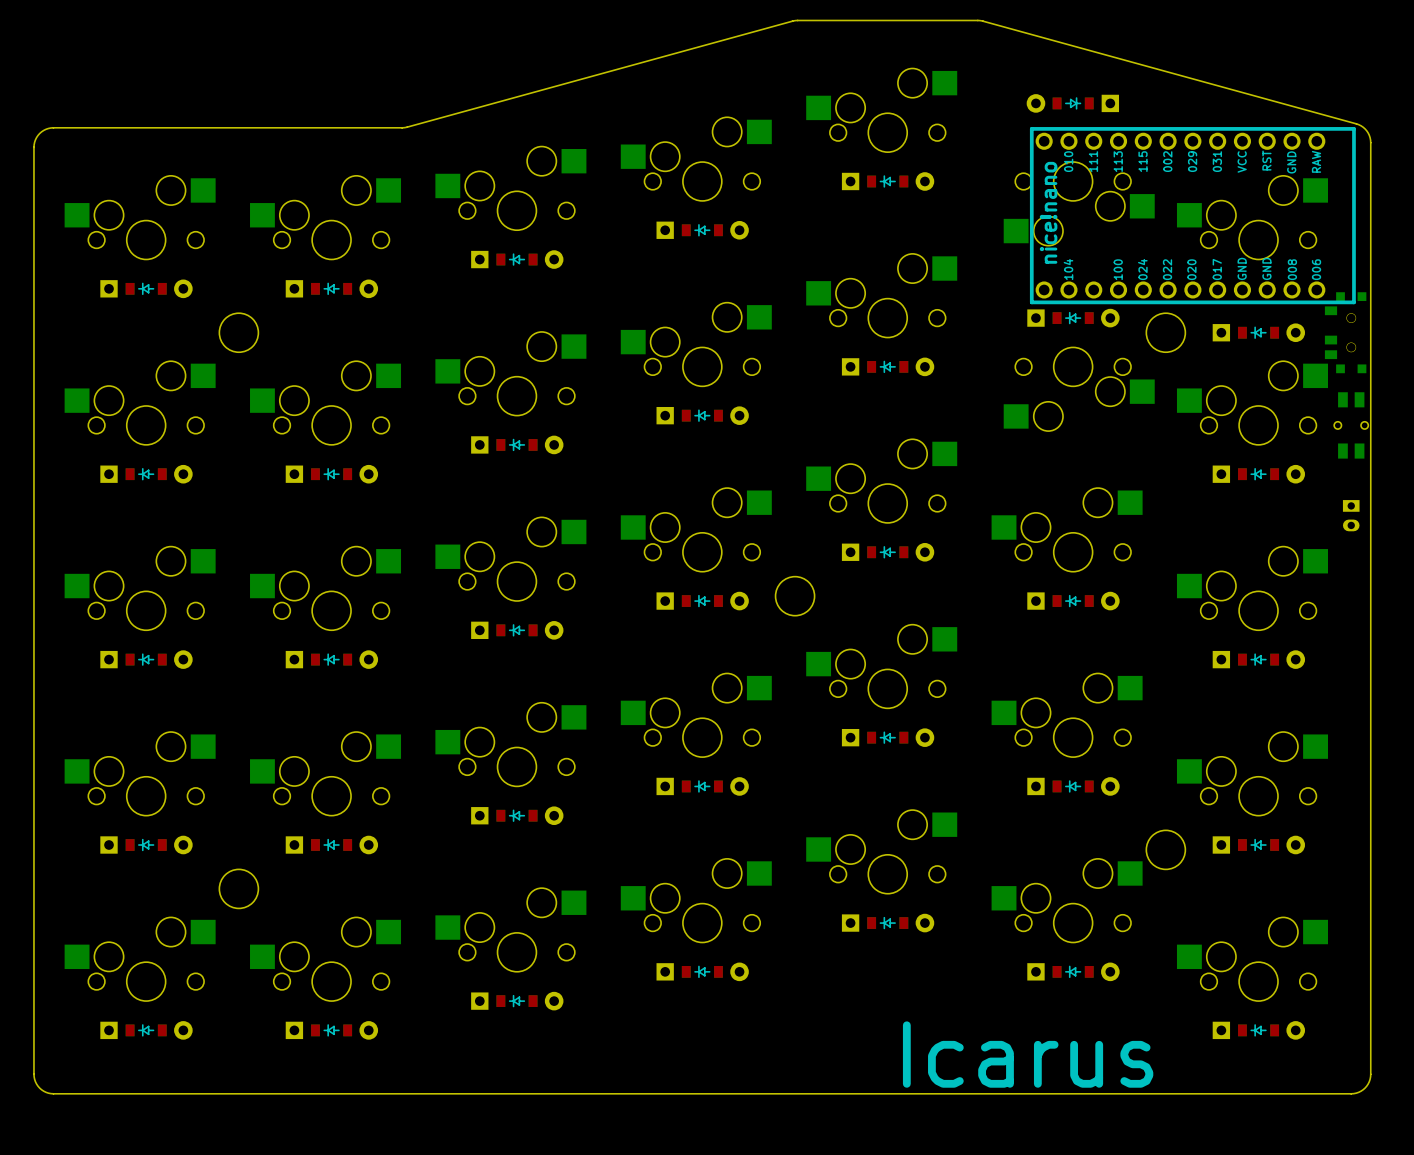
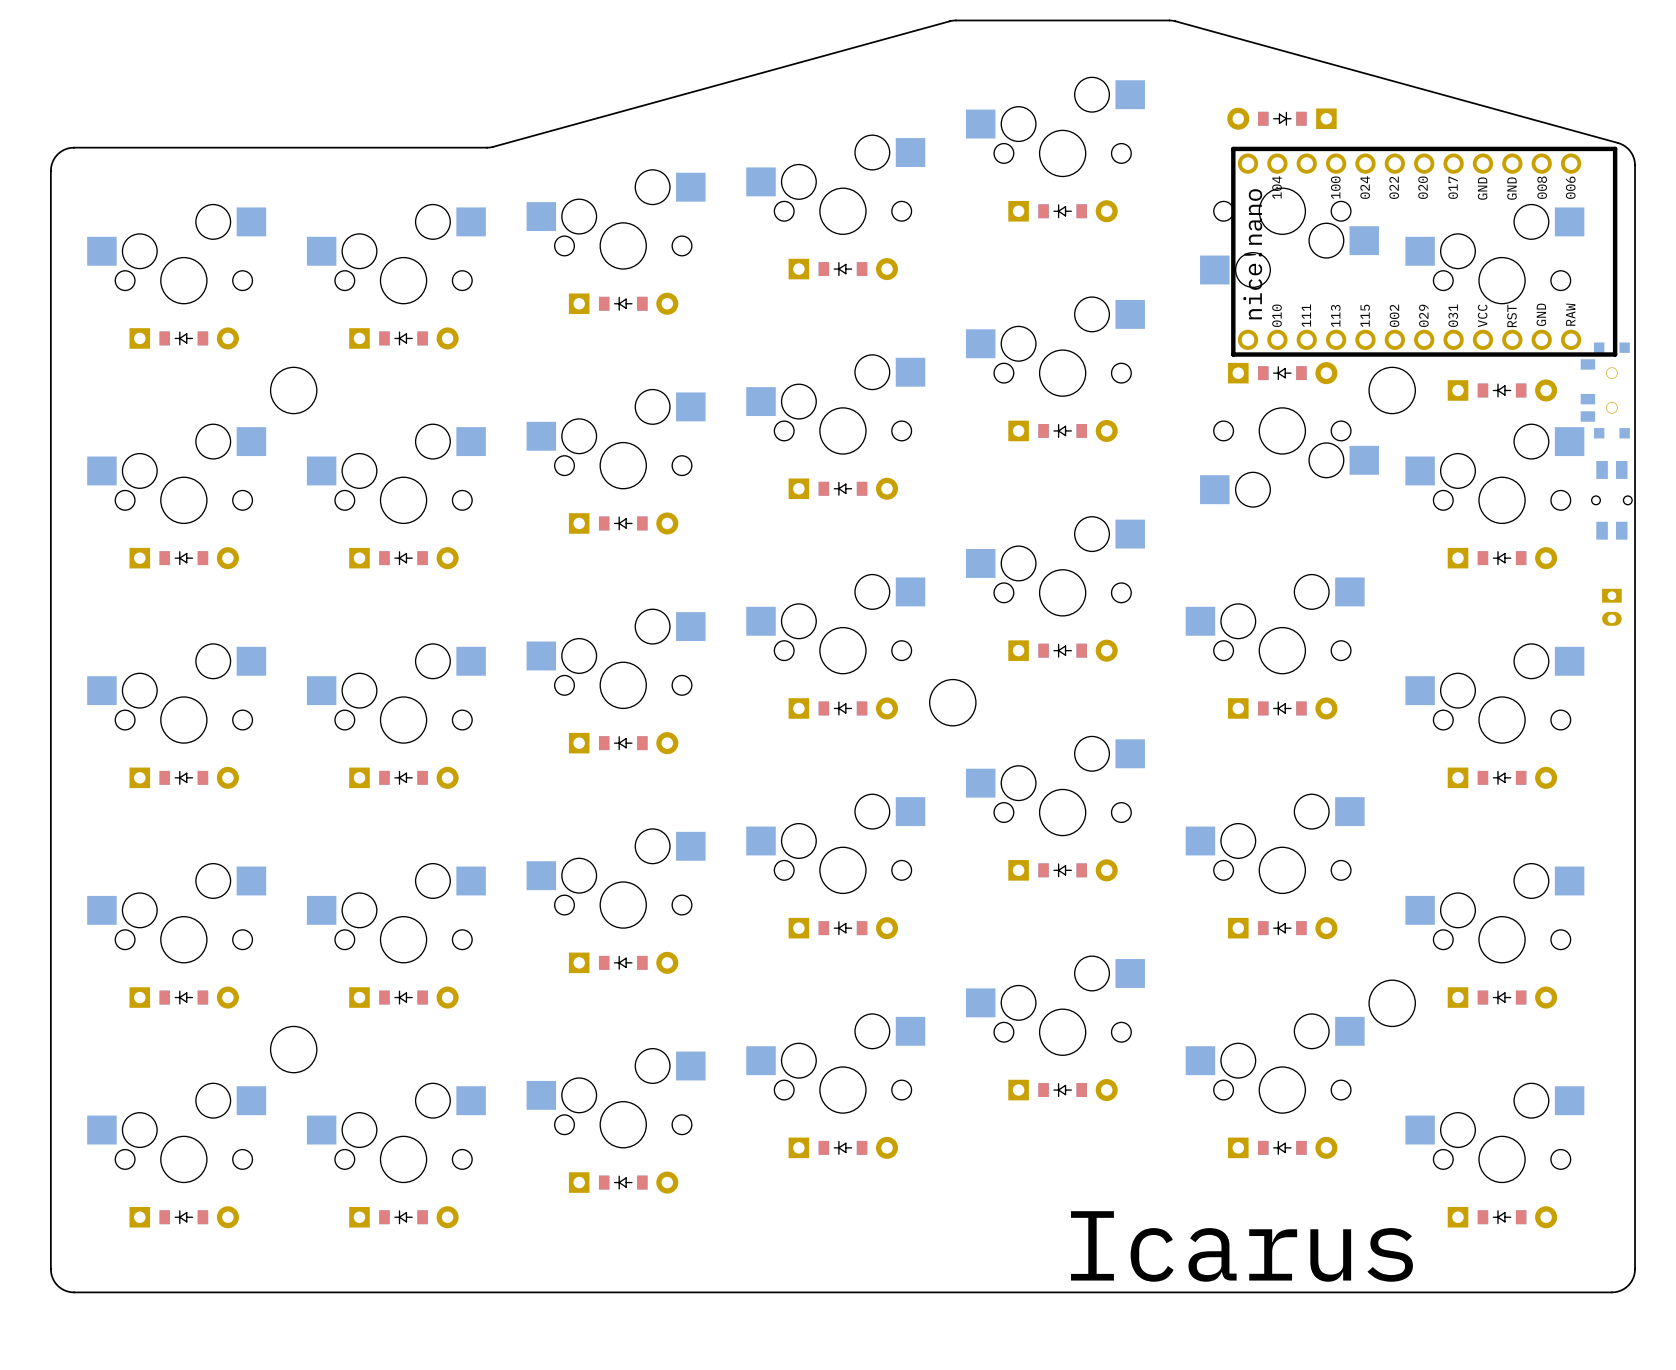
part footprint: [1029, 127, 1356, 305] -> [1231, 146, 1618, 357]

